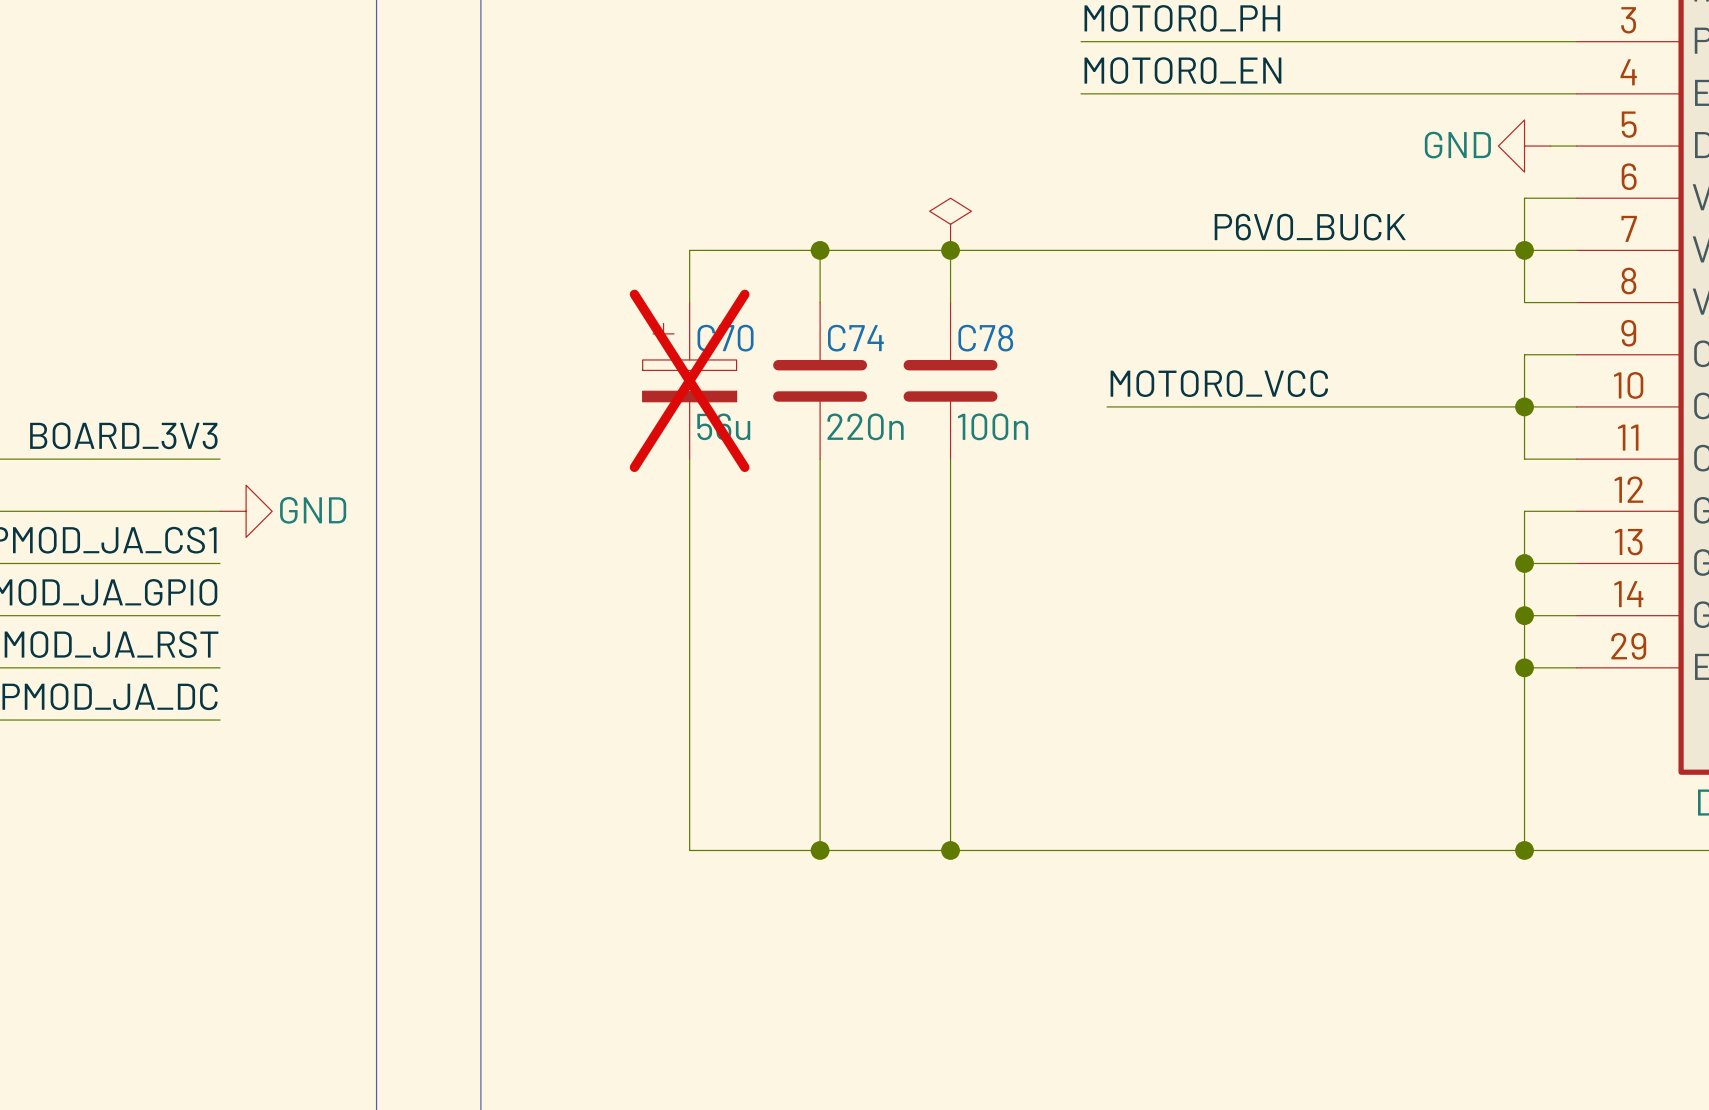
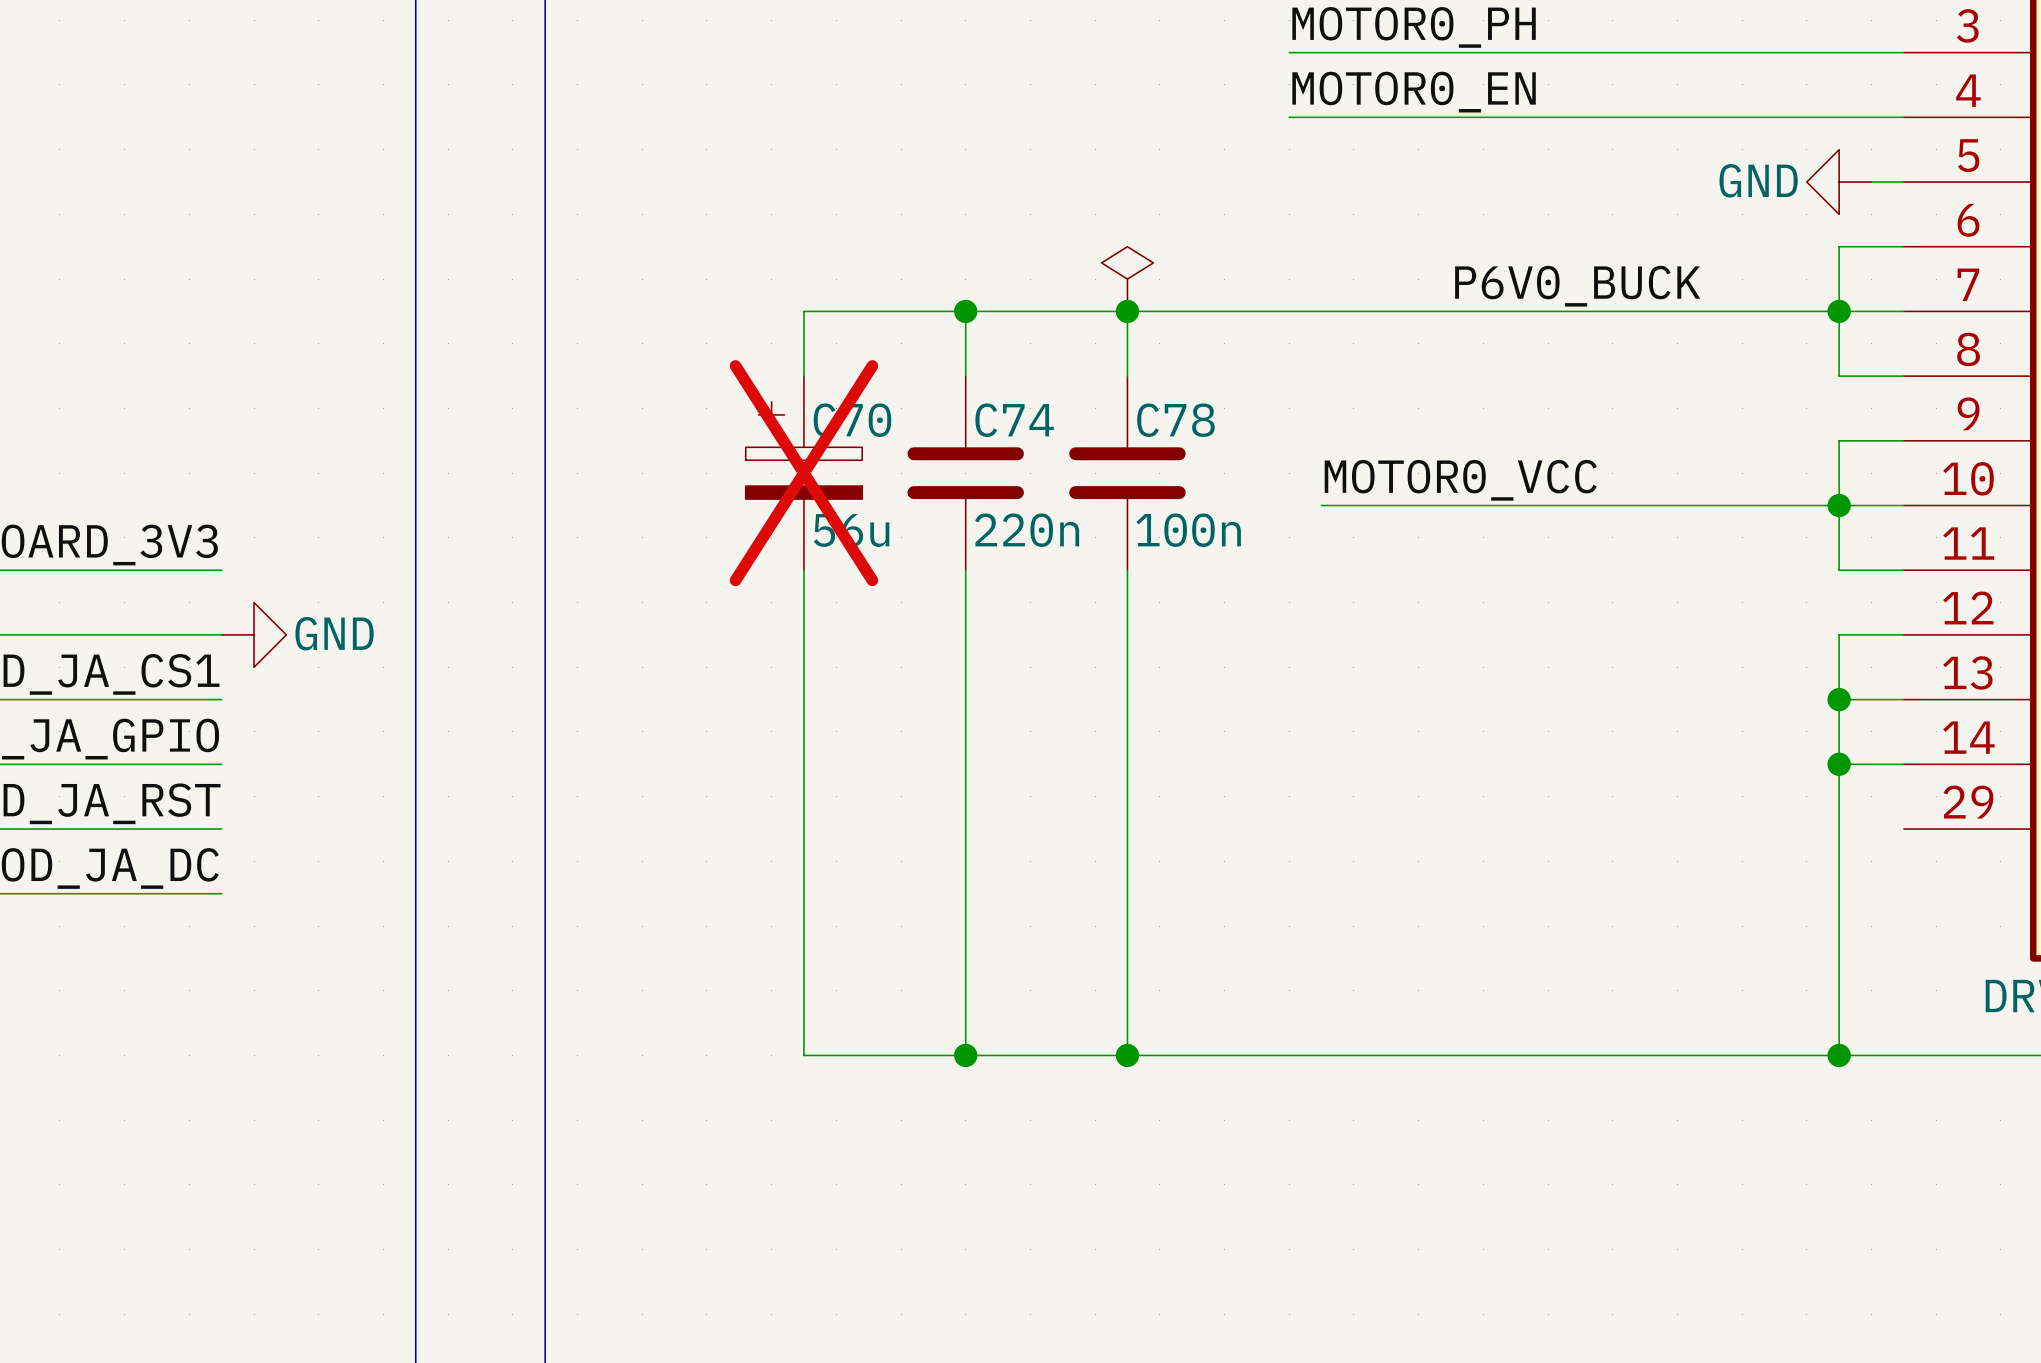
wire: (1524, 667) (1576, 667) -> none
junction: (1524, 667) -> none

